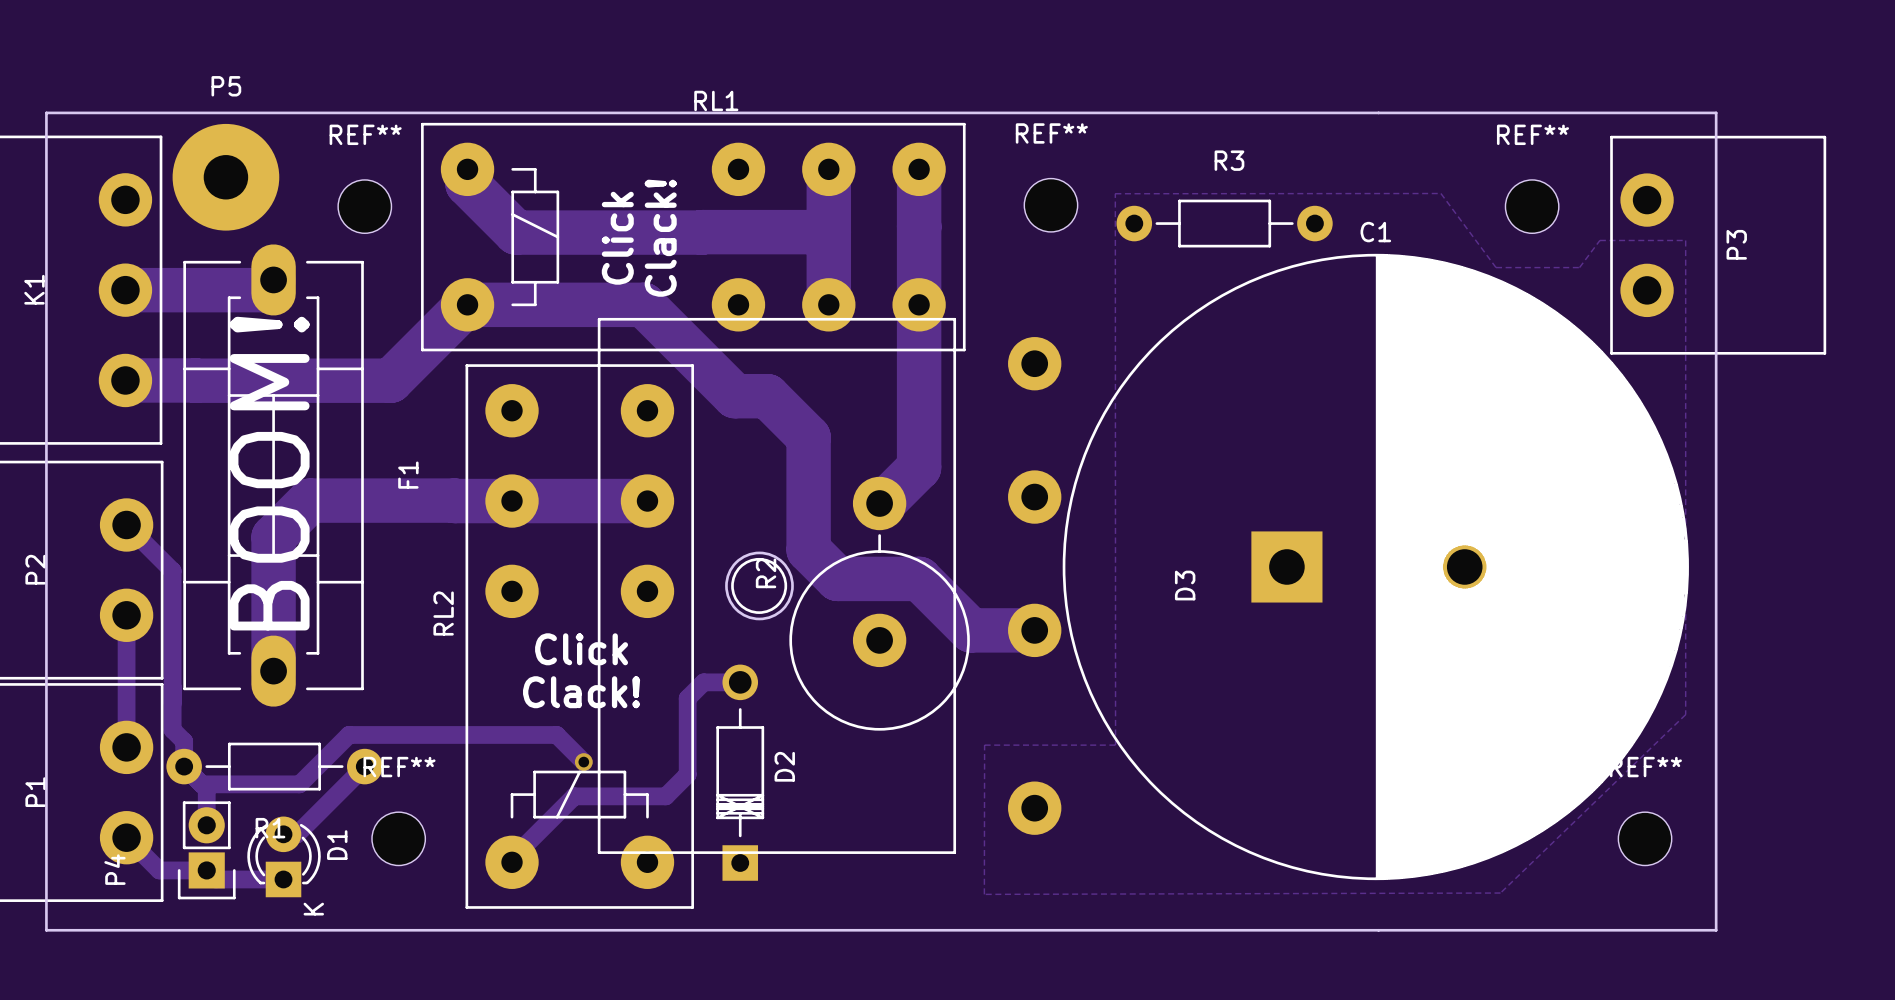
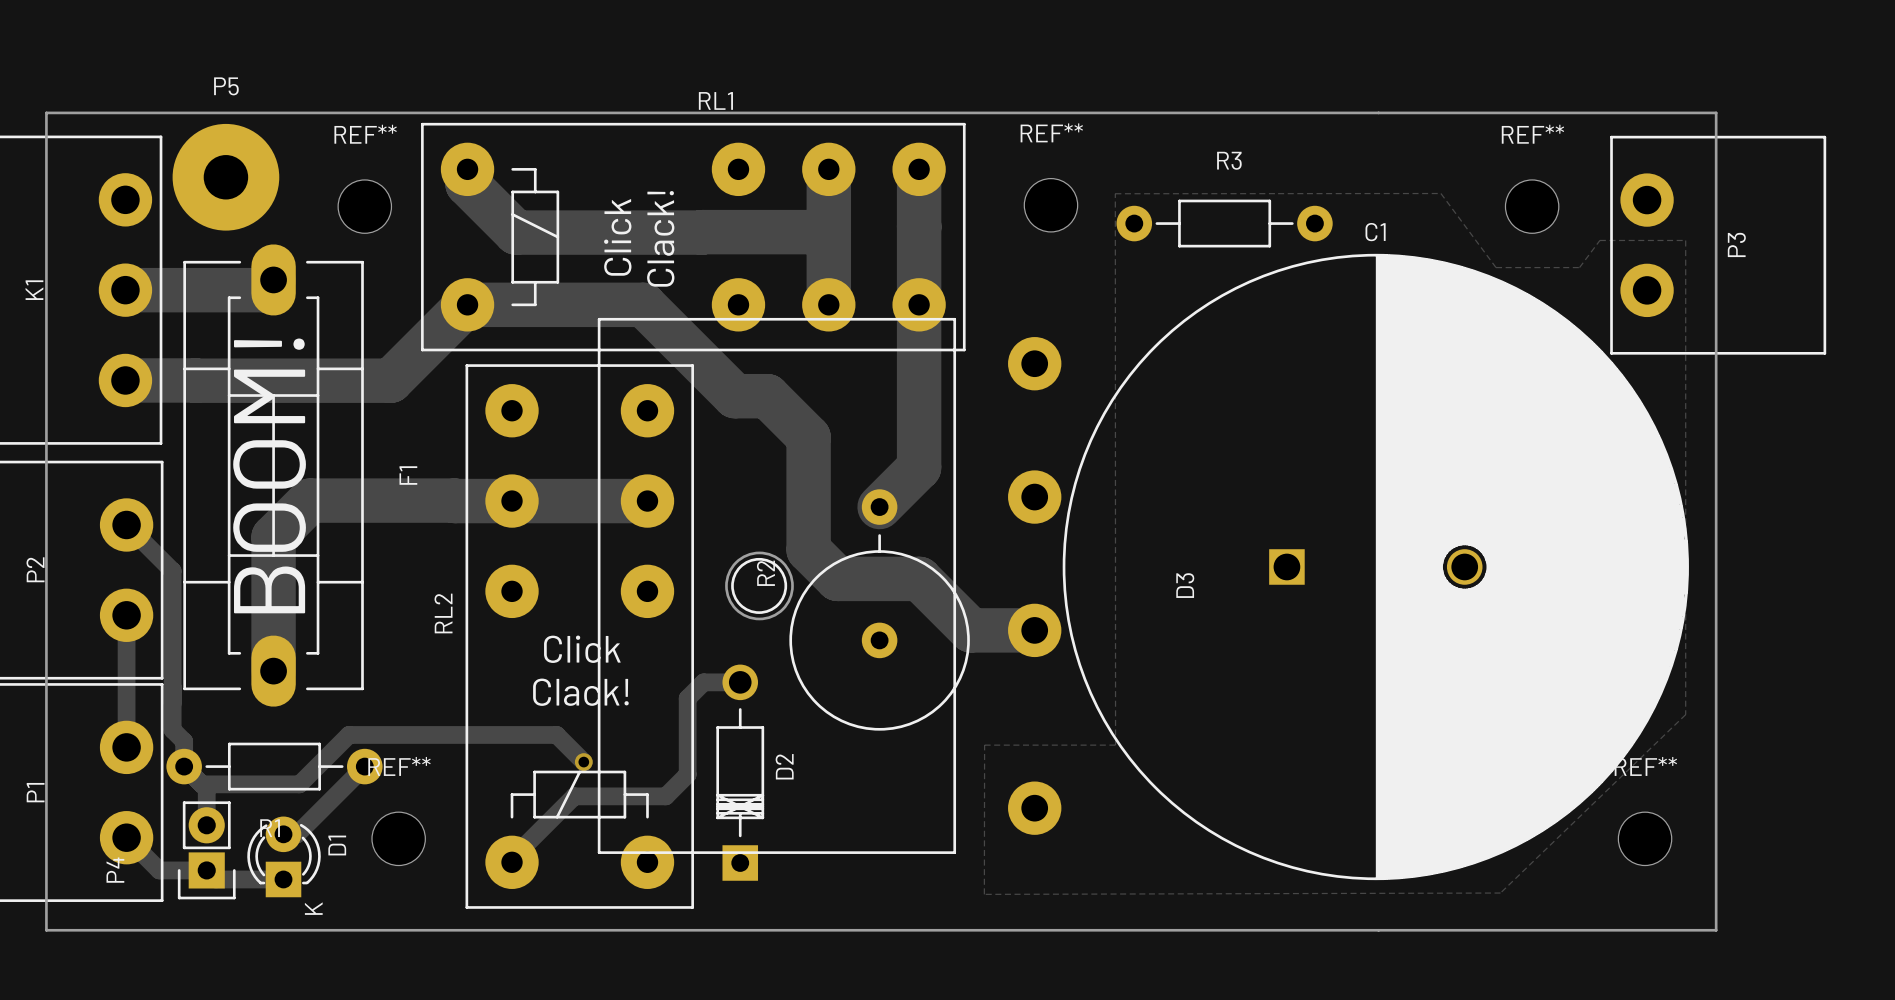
C1 footprint: [1062, 253, 1689, 881] -> [1062, 253, 1689, 881]
R2 footprint: [789, 476, 970, 731] -> [789, 489, 970, 731]

